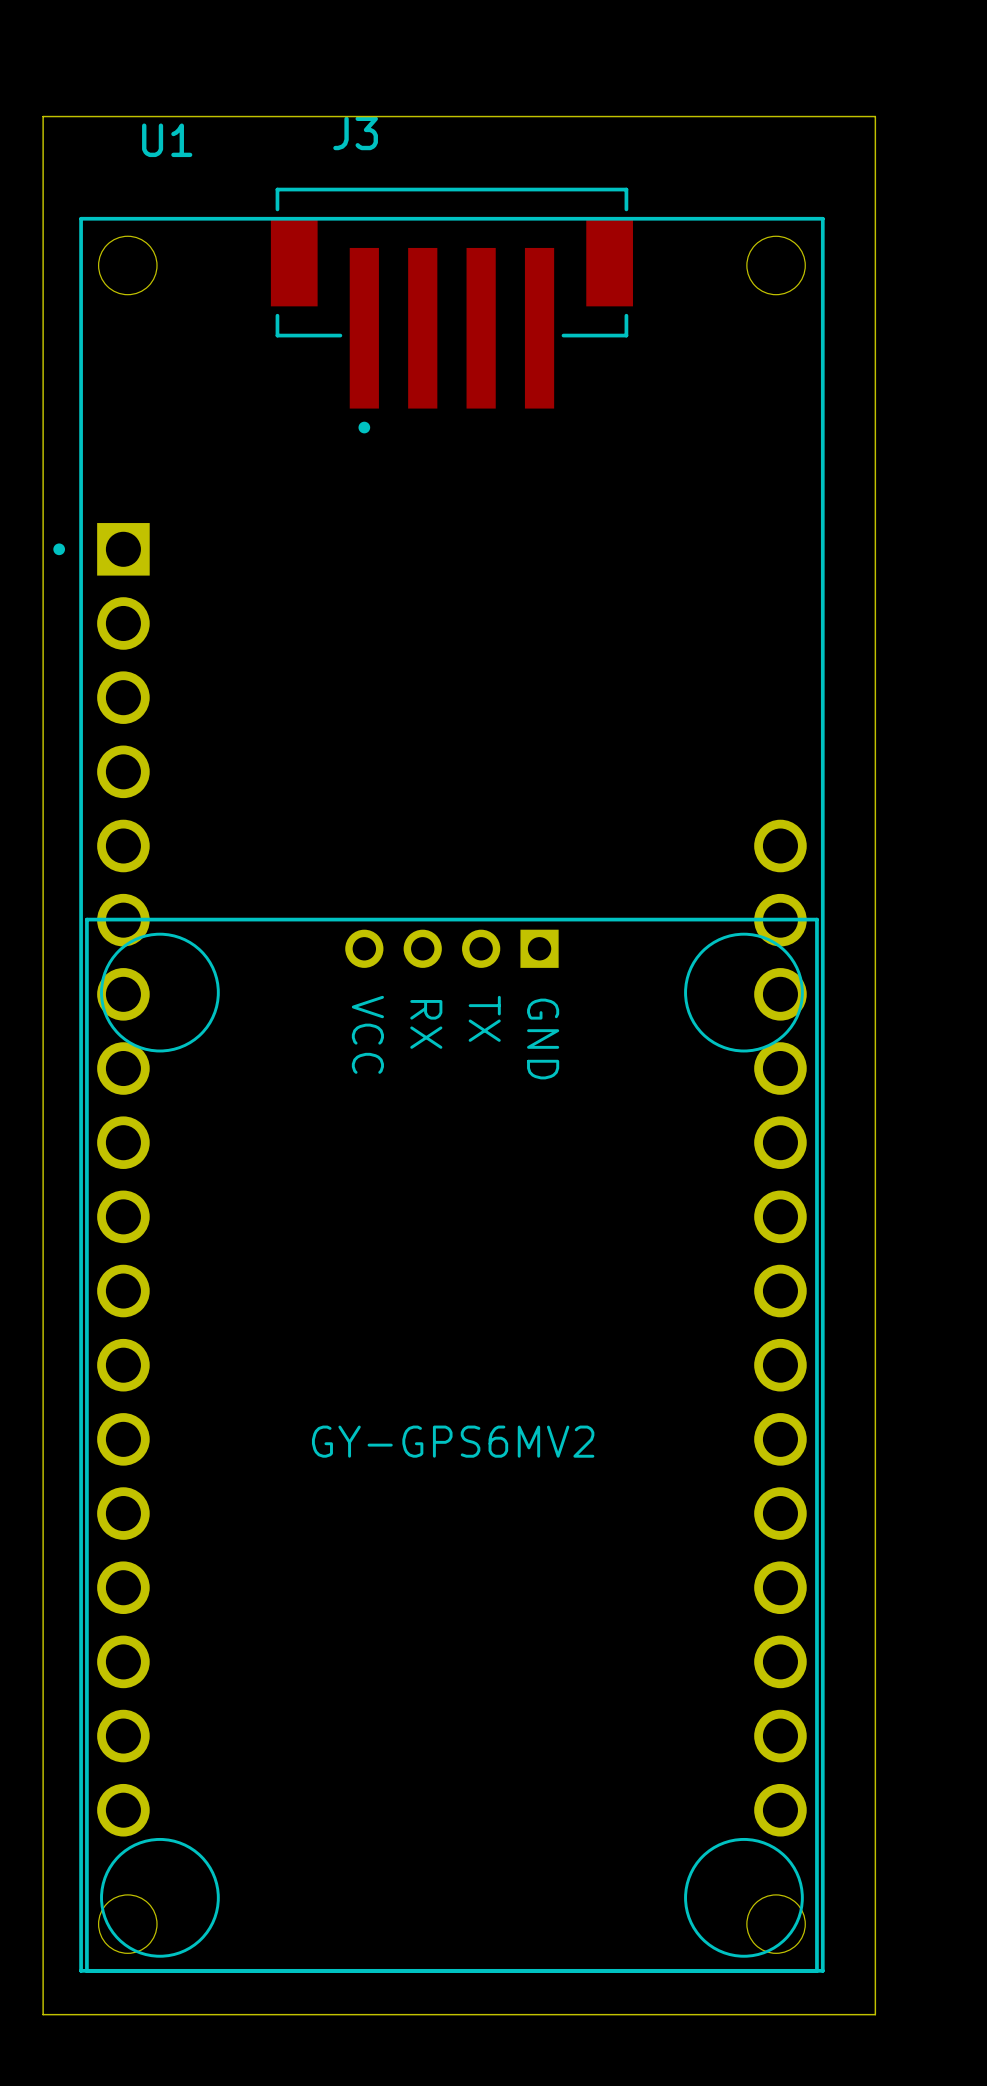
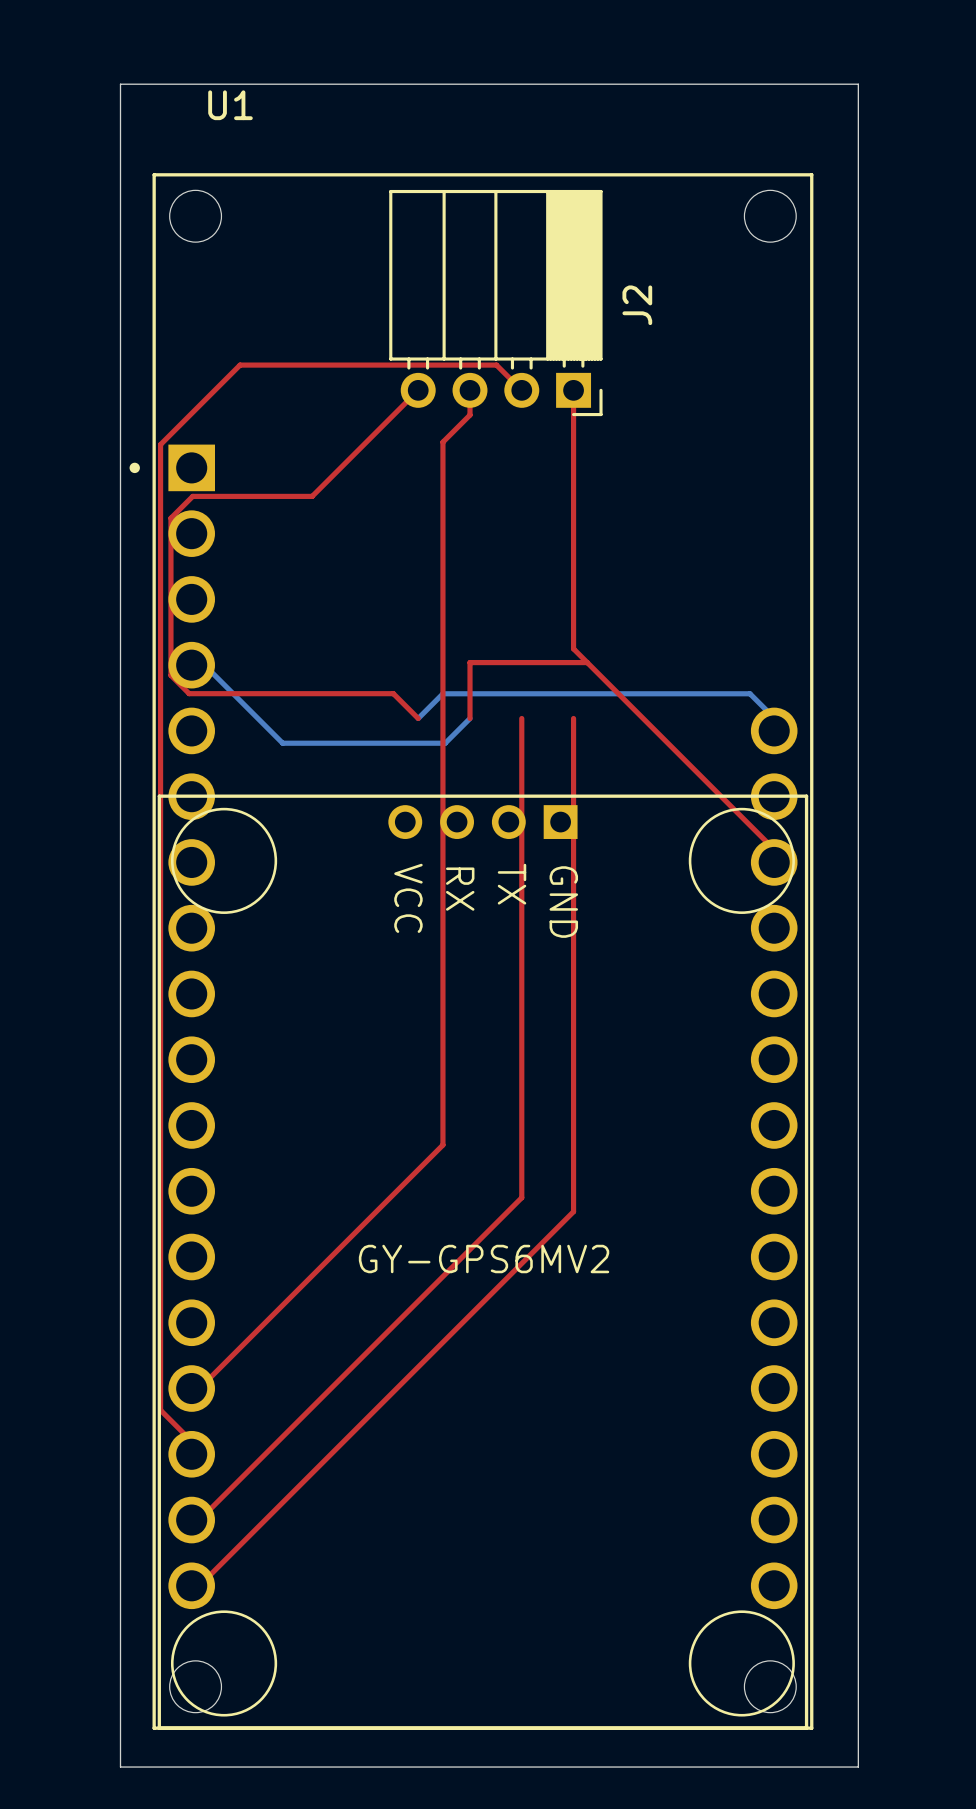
J3: (451, 310) -> none
J2: none -> (495, 303)
top track: none -> (418, 390) (312, 496) (192, 496) (170, 518) (170, 675) (189, 693) (393, 693) (418, 718)
top track: none -> (470, 390) (470, 415) (442, 442) (442, 1145) (202, 1385)
top track: none -> (521, 390) (496, 365) (240, 365) (160, 444) (160, 1410) (202, 1451)
top track: none -> (573, 390) (573, 648) (784, 859)
bottom track: none -> (202, 662) (282, 743) (445, 743) (470, 718)
top track: none -> (587, 662) (470, 662) (470, 718)
bottom track: none -> (418, 718) (442, 693) (750, 693) (784, 728)
top track: none -> (521, 718) (521, 1197) (202, 1517)
top track: none -> (573, 718) (573, 1211) (202, 1583)

